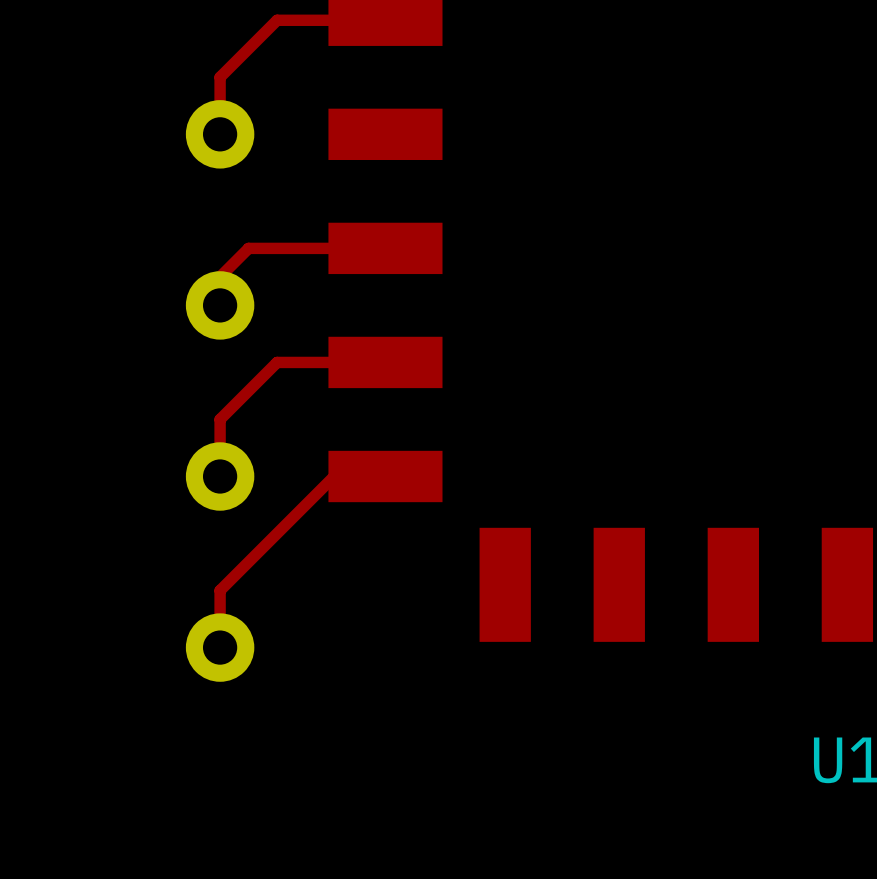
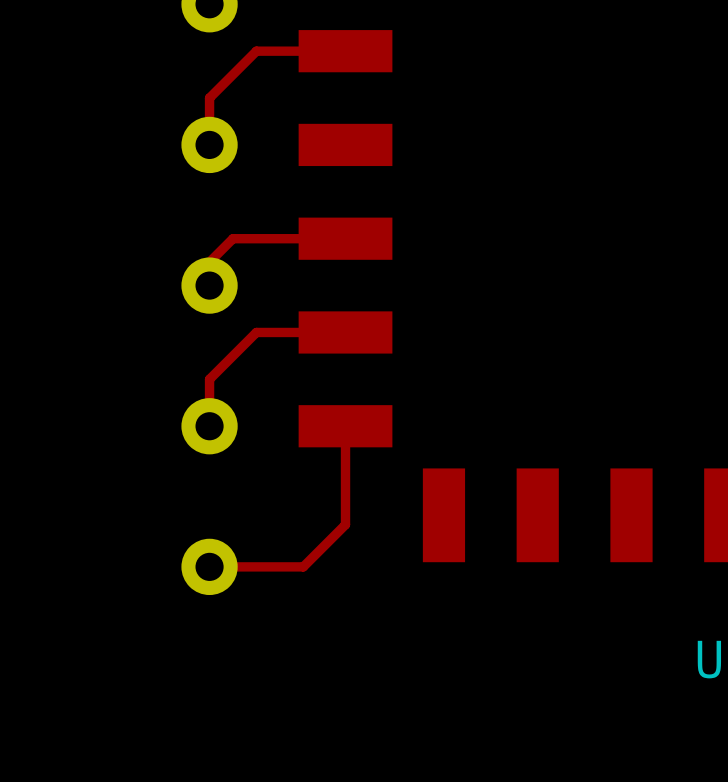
track: (385, 476) (334, 476) (220, 590) (220, 647) -> (345, 426) (345, 524) (303, 566) (209, 566)

